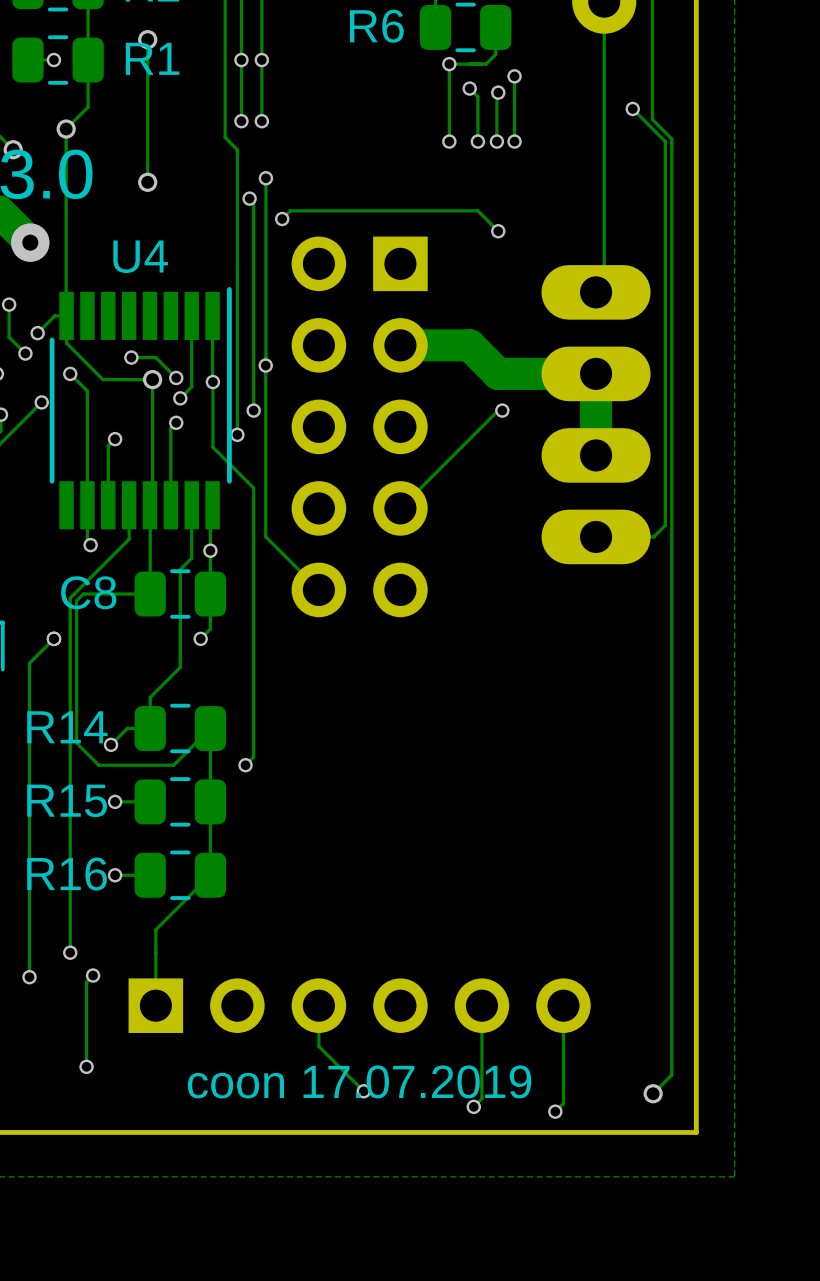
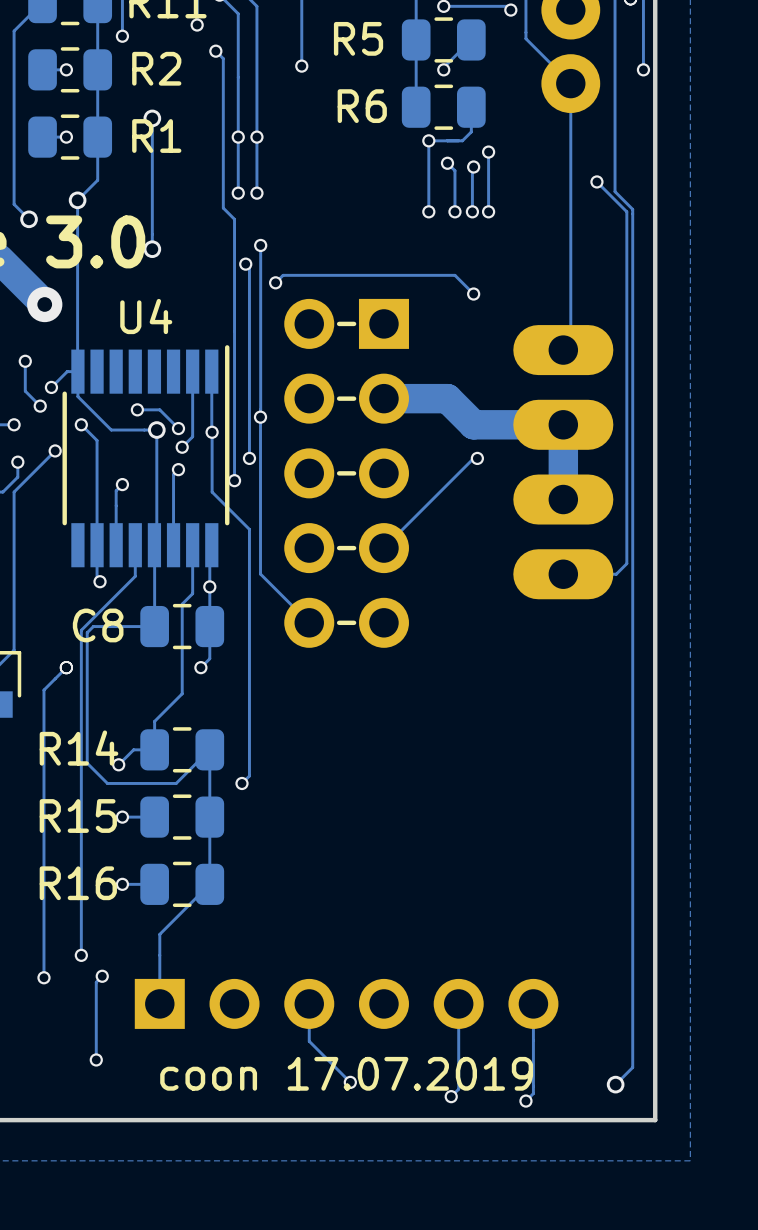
line: none -> (354, 323) (339, 323)
line: none -> (354, 398) (339, 398)
line: none -> (354, 473) (339, 473)
line: none -> (354, 548) (339, 548)
line: none -> (354, 622) (339, 622)

